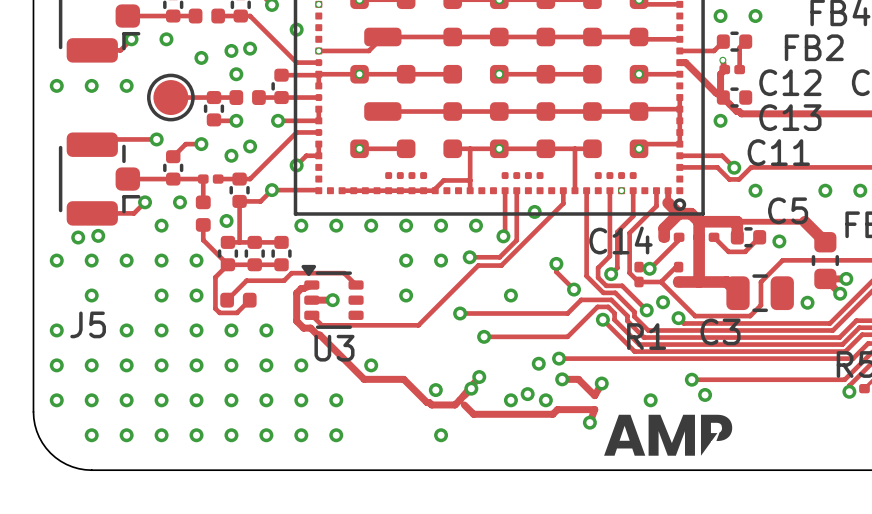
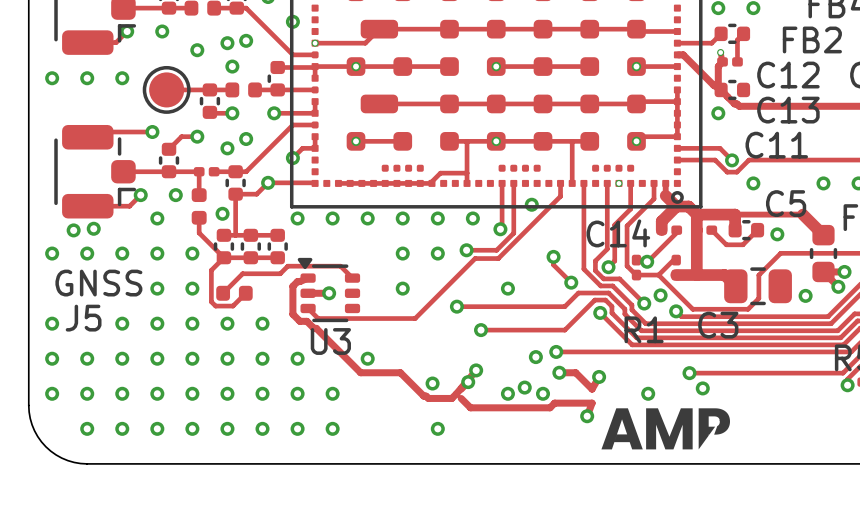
text: none -> GNSS (98, 283)
via: (91, 295) -> none

